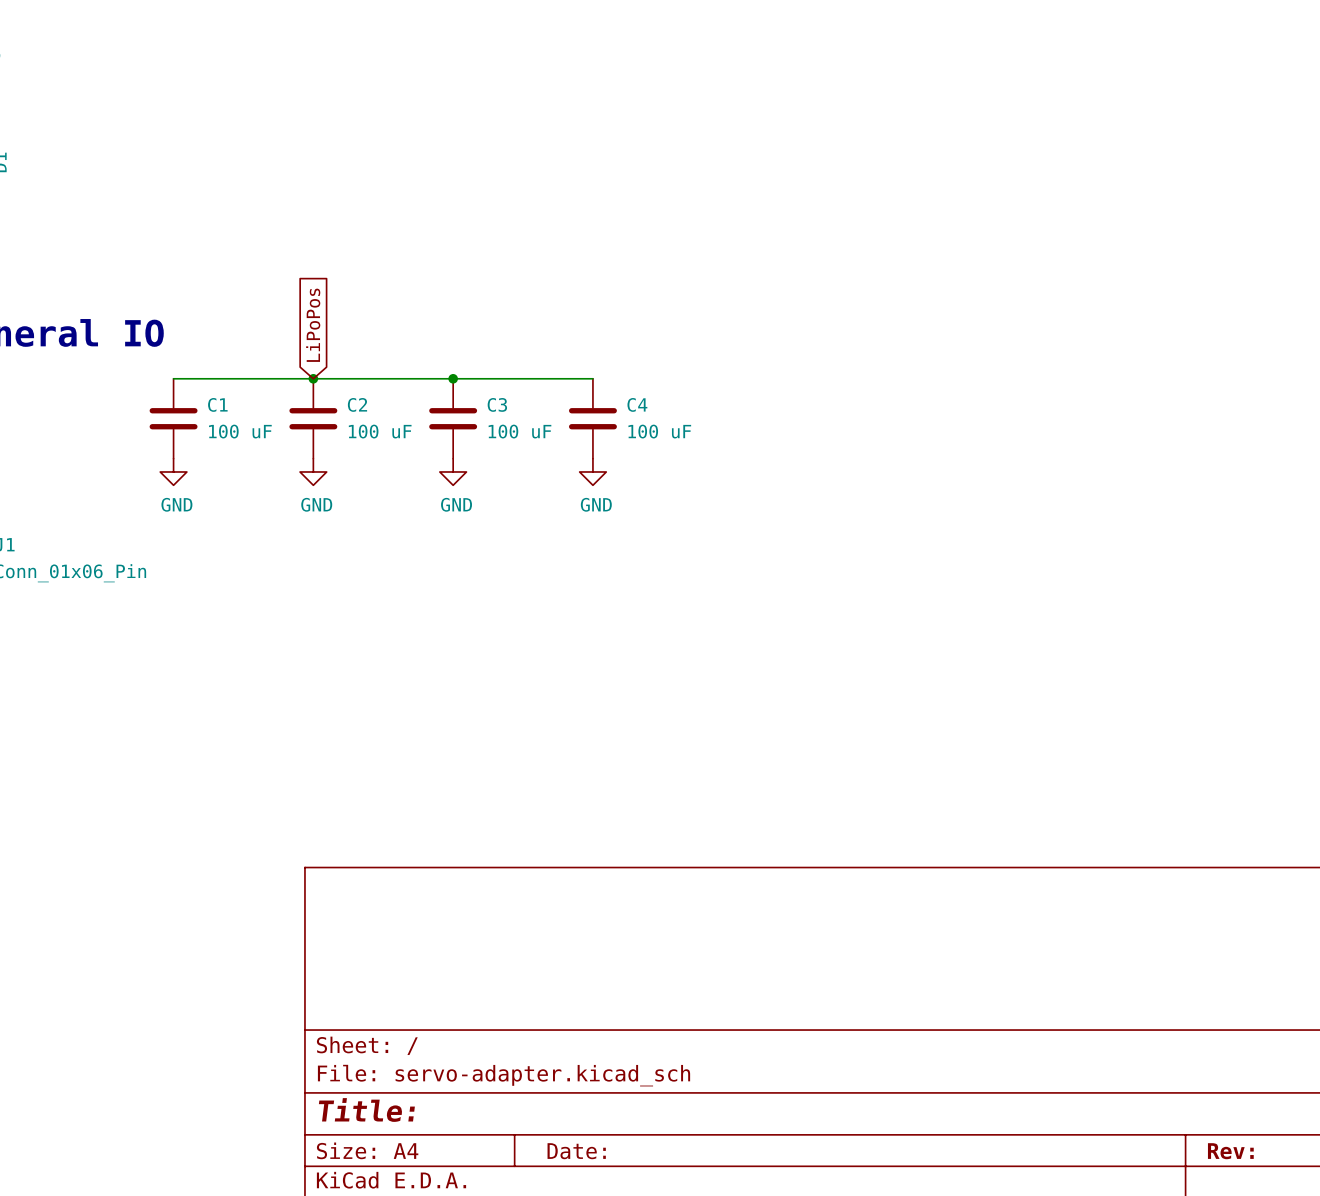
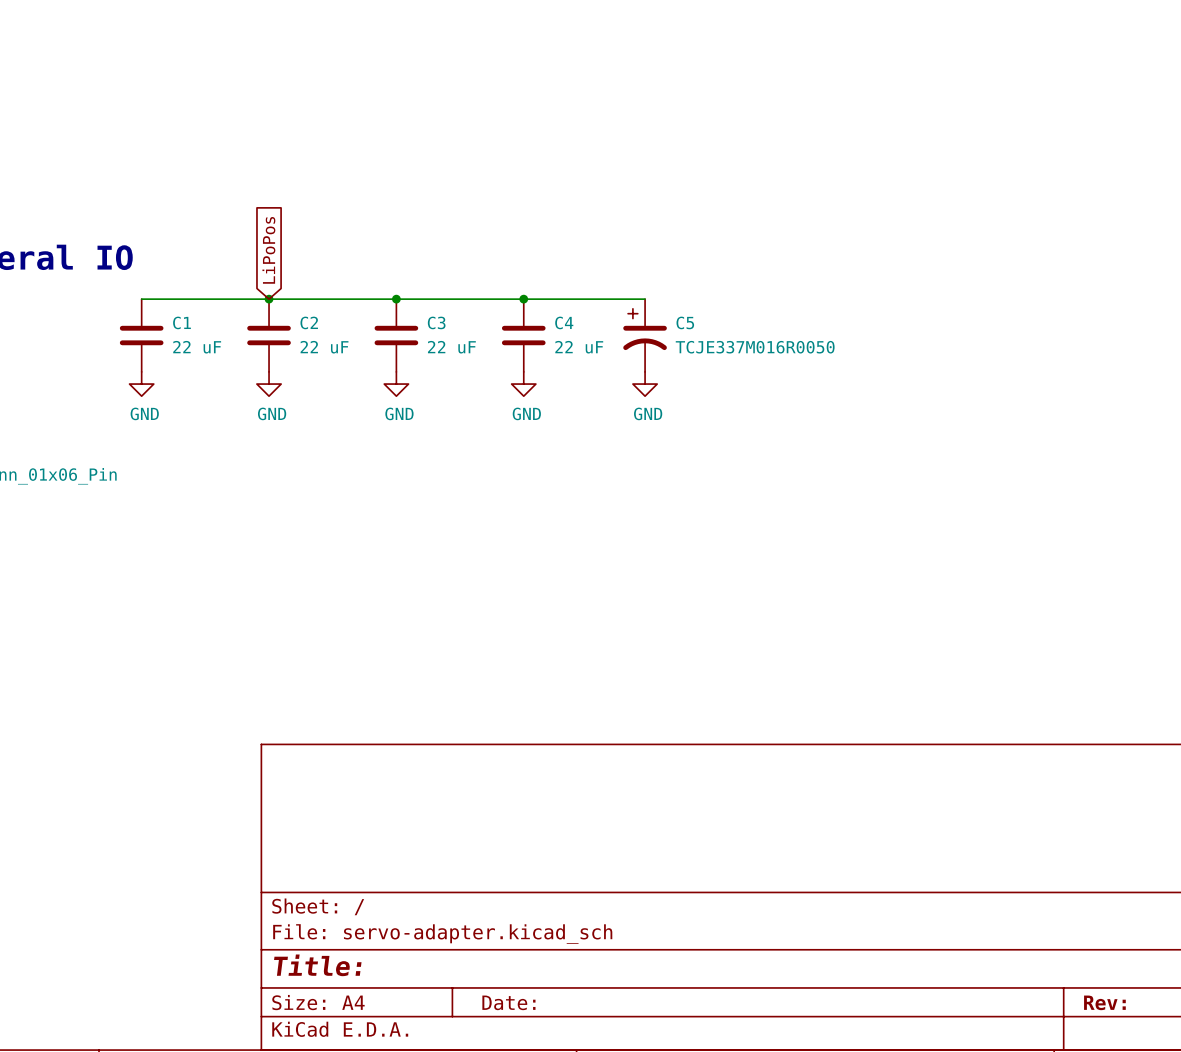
wire: none -> (523, 299) (645, 299)
junction: none -> (523, 299)
C5: none -> TCJE337M016R0050 (645, 335)
C1 value: 100 uF (240, 431) -> 22 uF (197, 347)
C2 value: 100 uF (380, 431) -> 22 uF (324, 347)
C3 value: 100 uF (519, 431) -> 22 uF (451, 347)
C4 value: 100 uF (659, 431) -> 22 uF (579, 347)
power symbol: none -> GND (645, 384)

